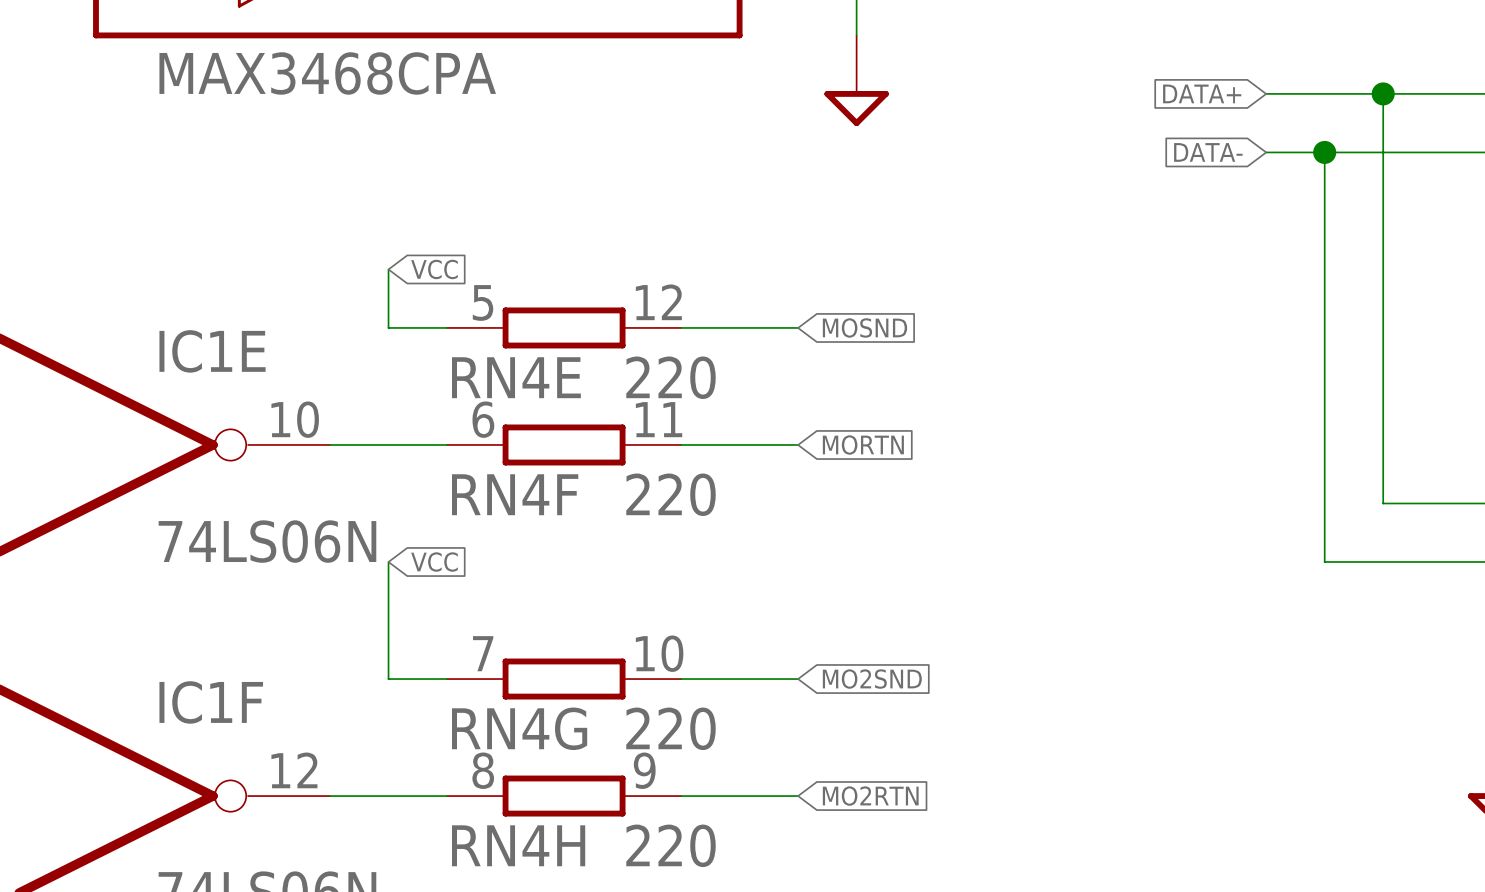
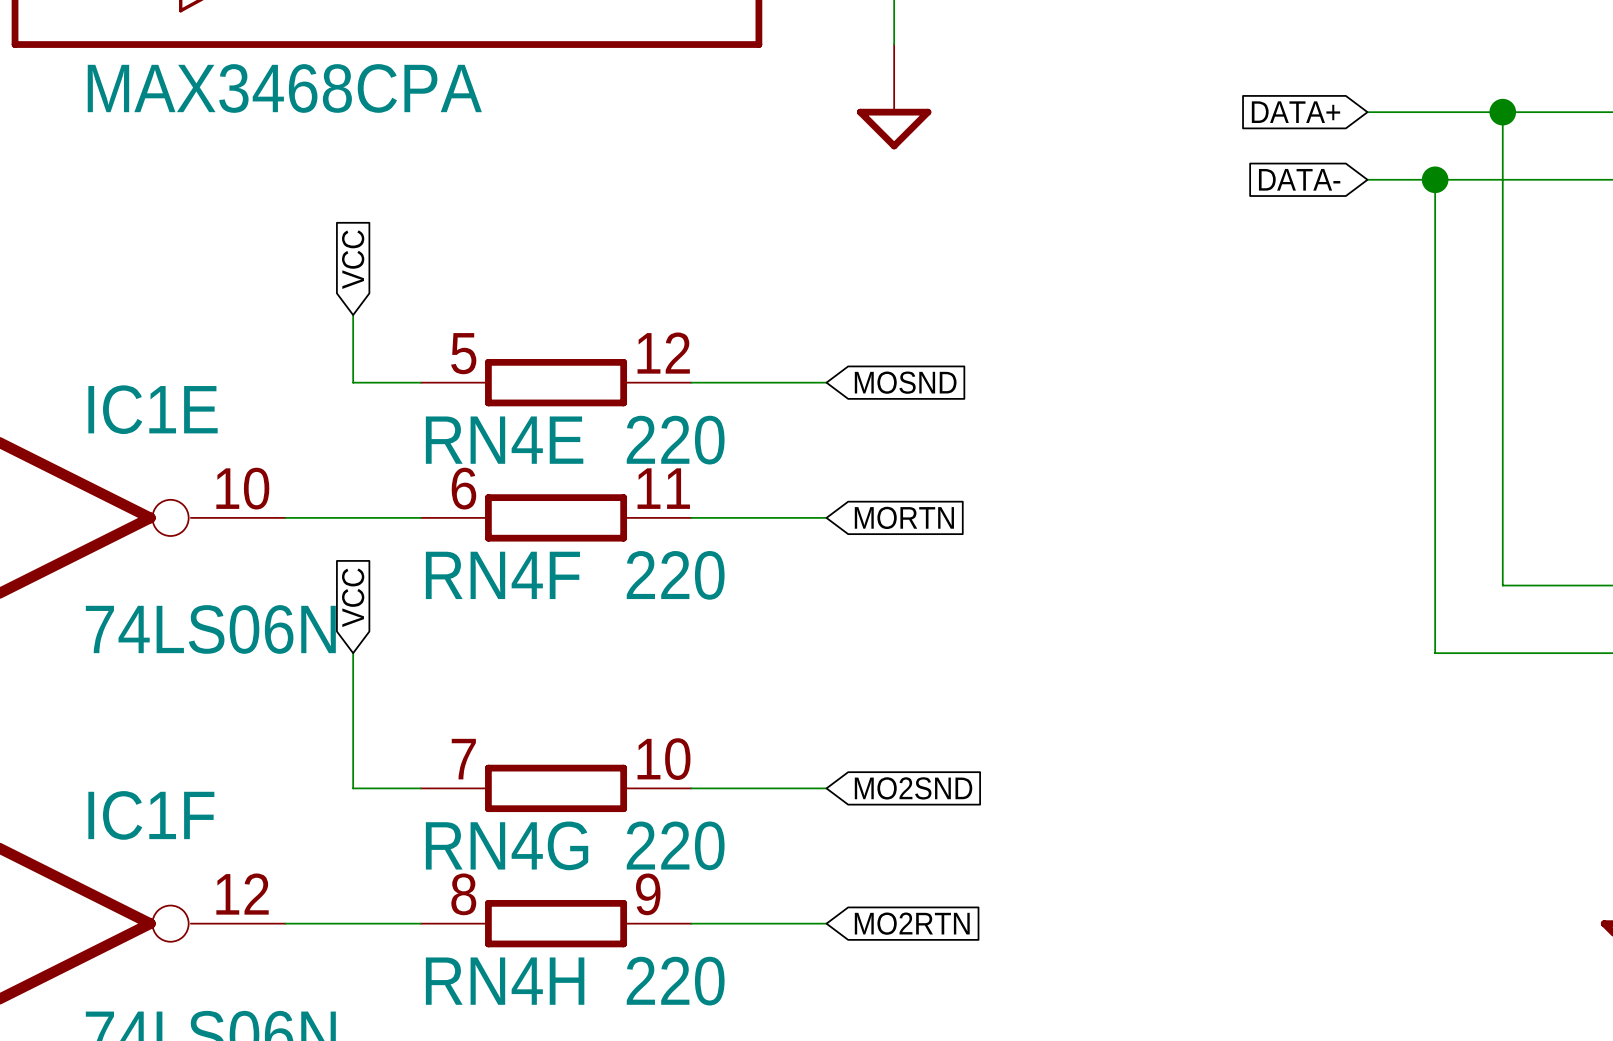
global label rotation: 0° (434, 269) -> 90° counterclockwise (353, 259)
global label rotation: 0° (434, 562) -> 90° counterclockwise (353, 597)

